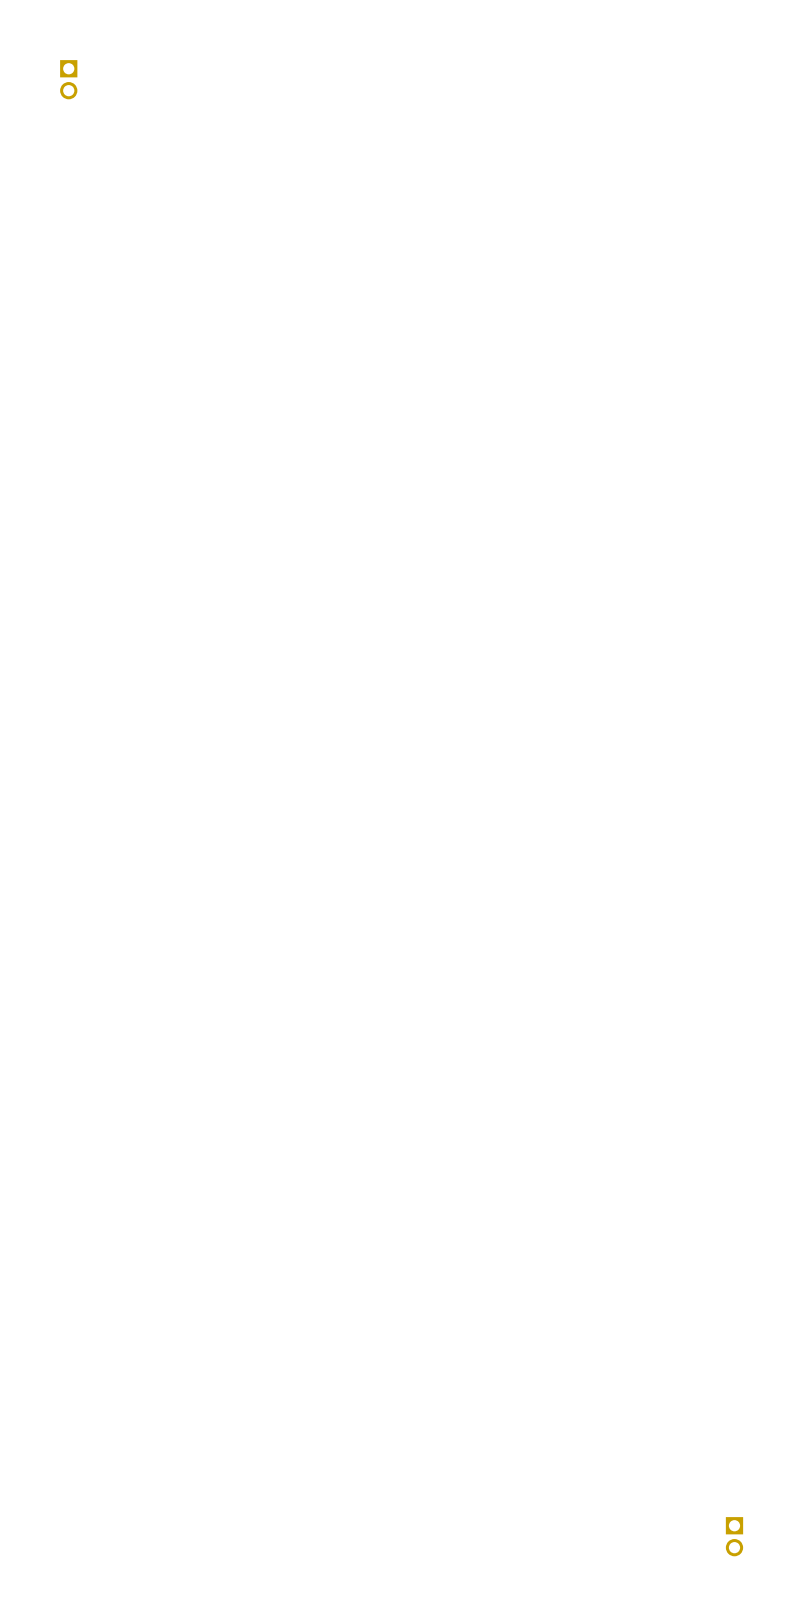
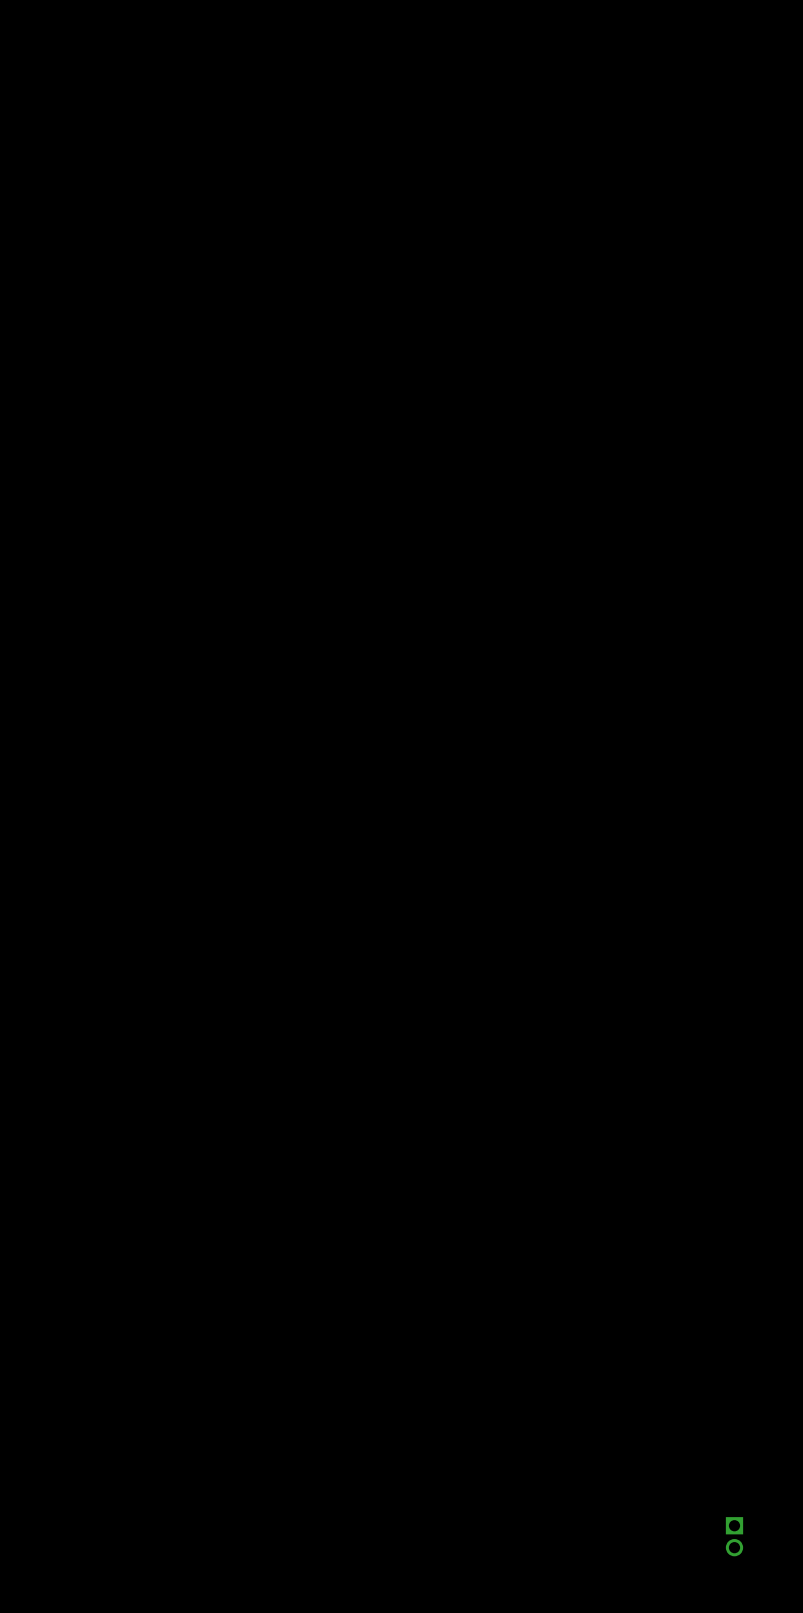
part: (68, 79) -> none

